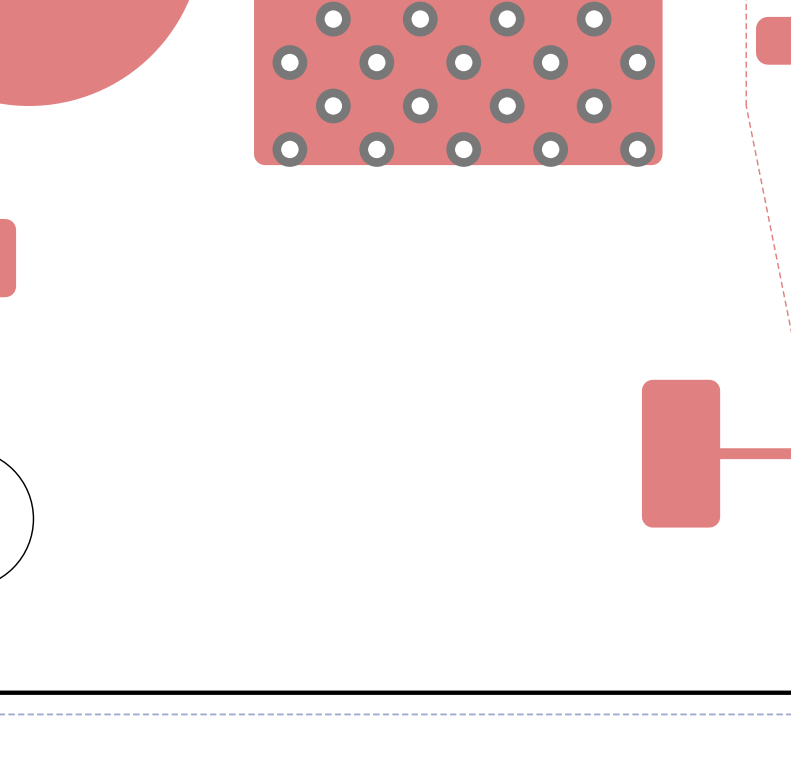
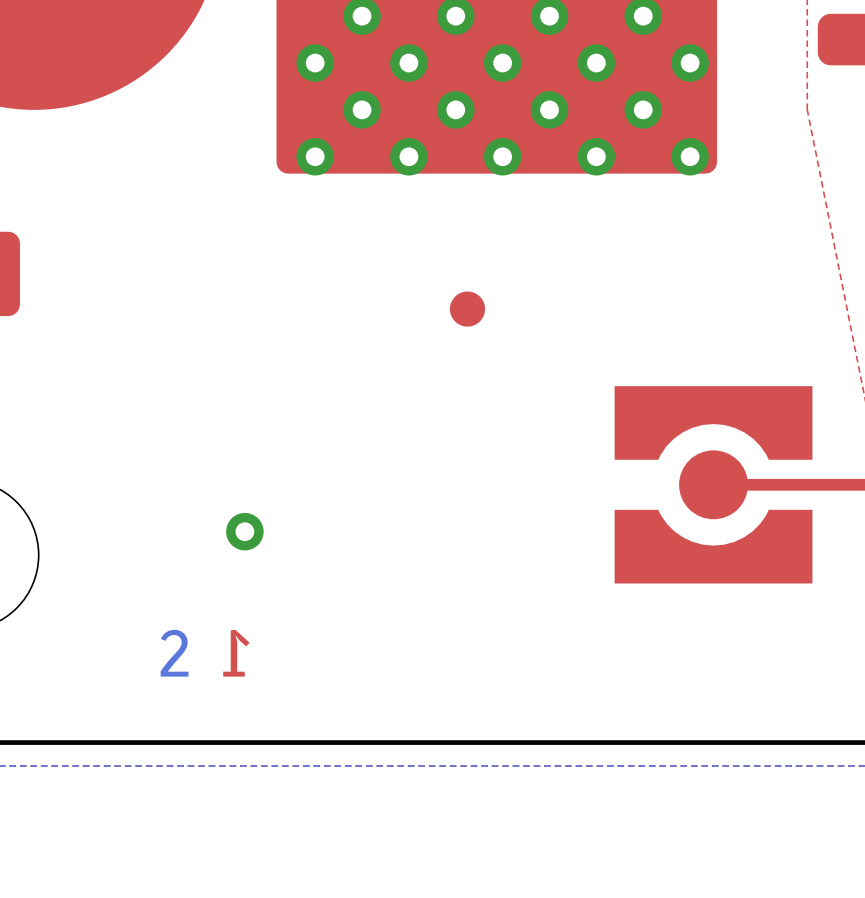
part: none -> (467, 309)
part footprint: [641, 379, 721, 528] -> [614, 386, 813, 584]
via: none -> (244, 531)
drawing: none -> [160, 629, 250, 677]

